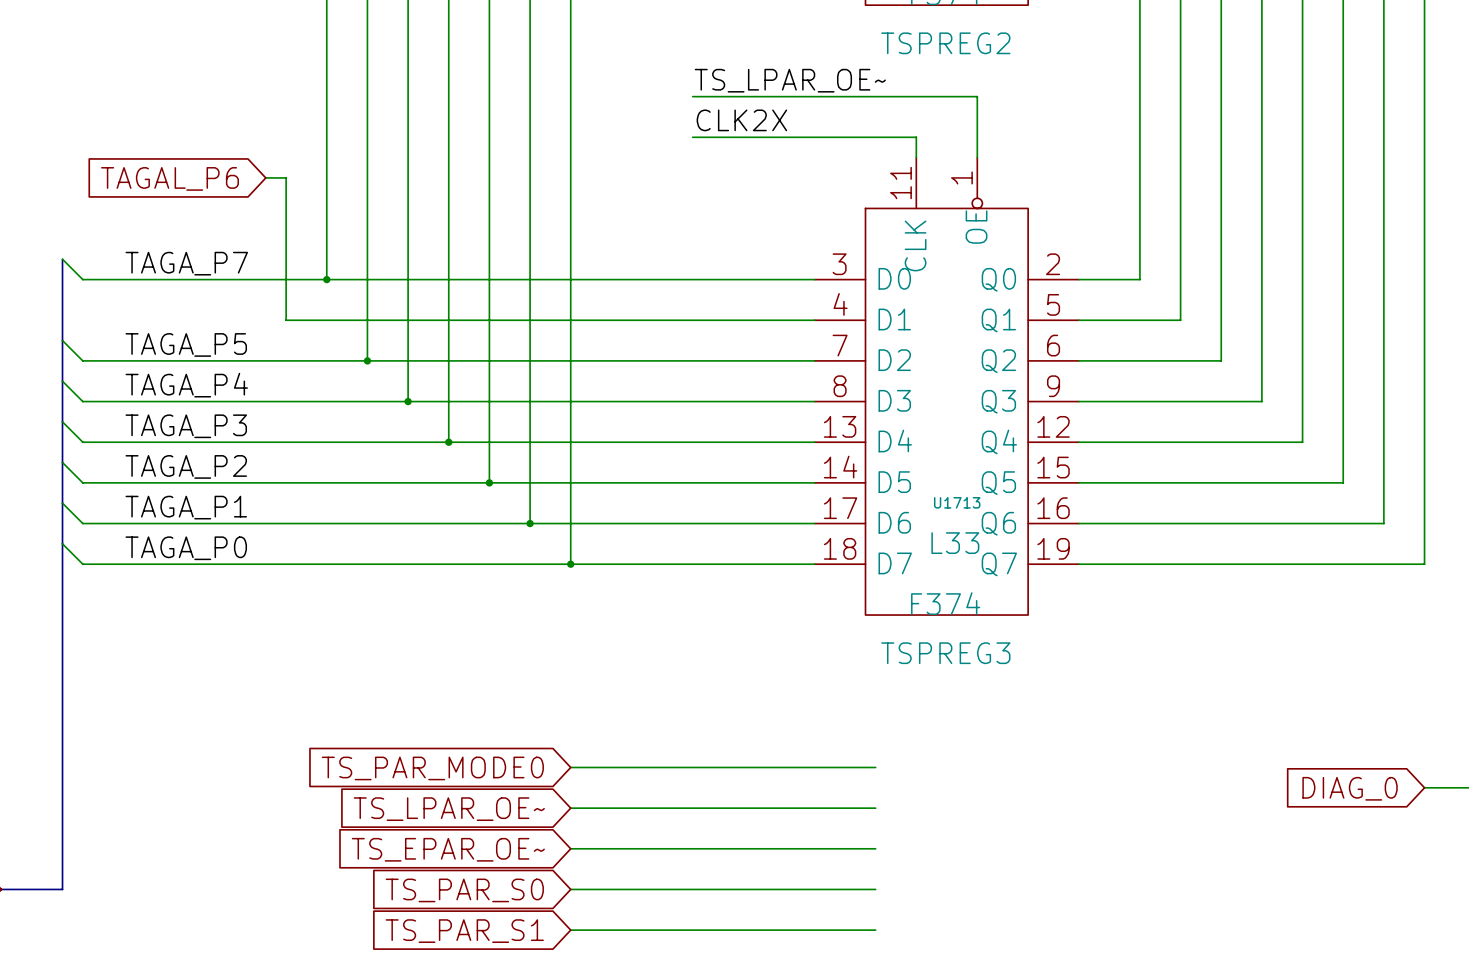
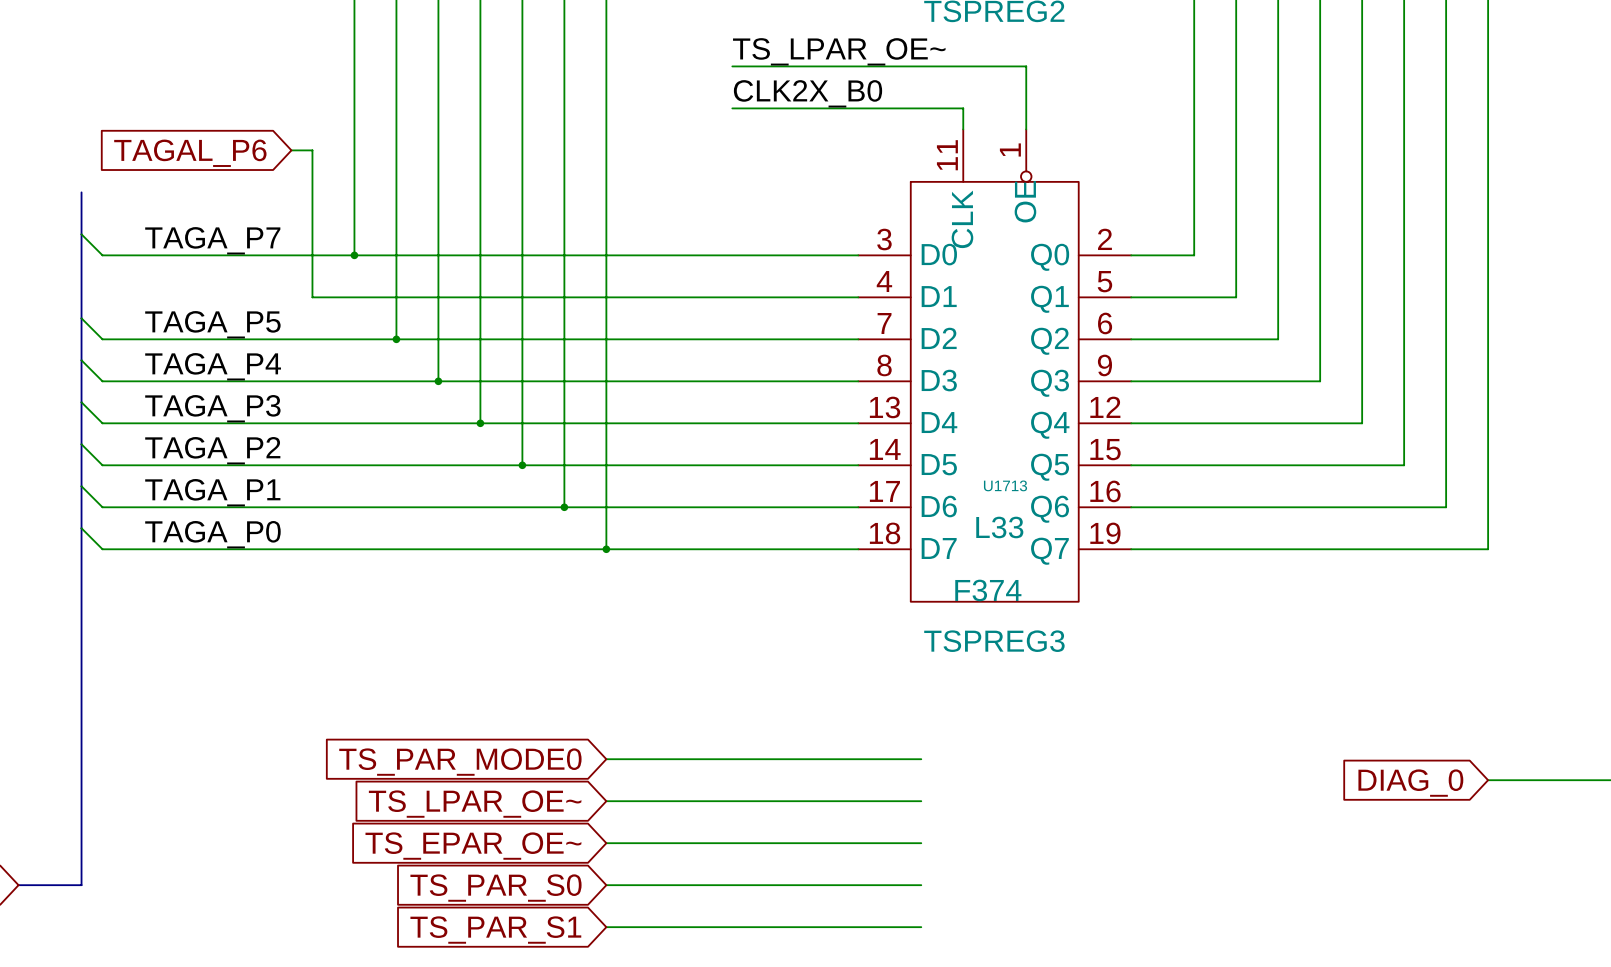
label: CLK2X (741, 120) -> CLK2X_B0 (808, 93)
bus: none -> (81, 192) (81, 234)

